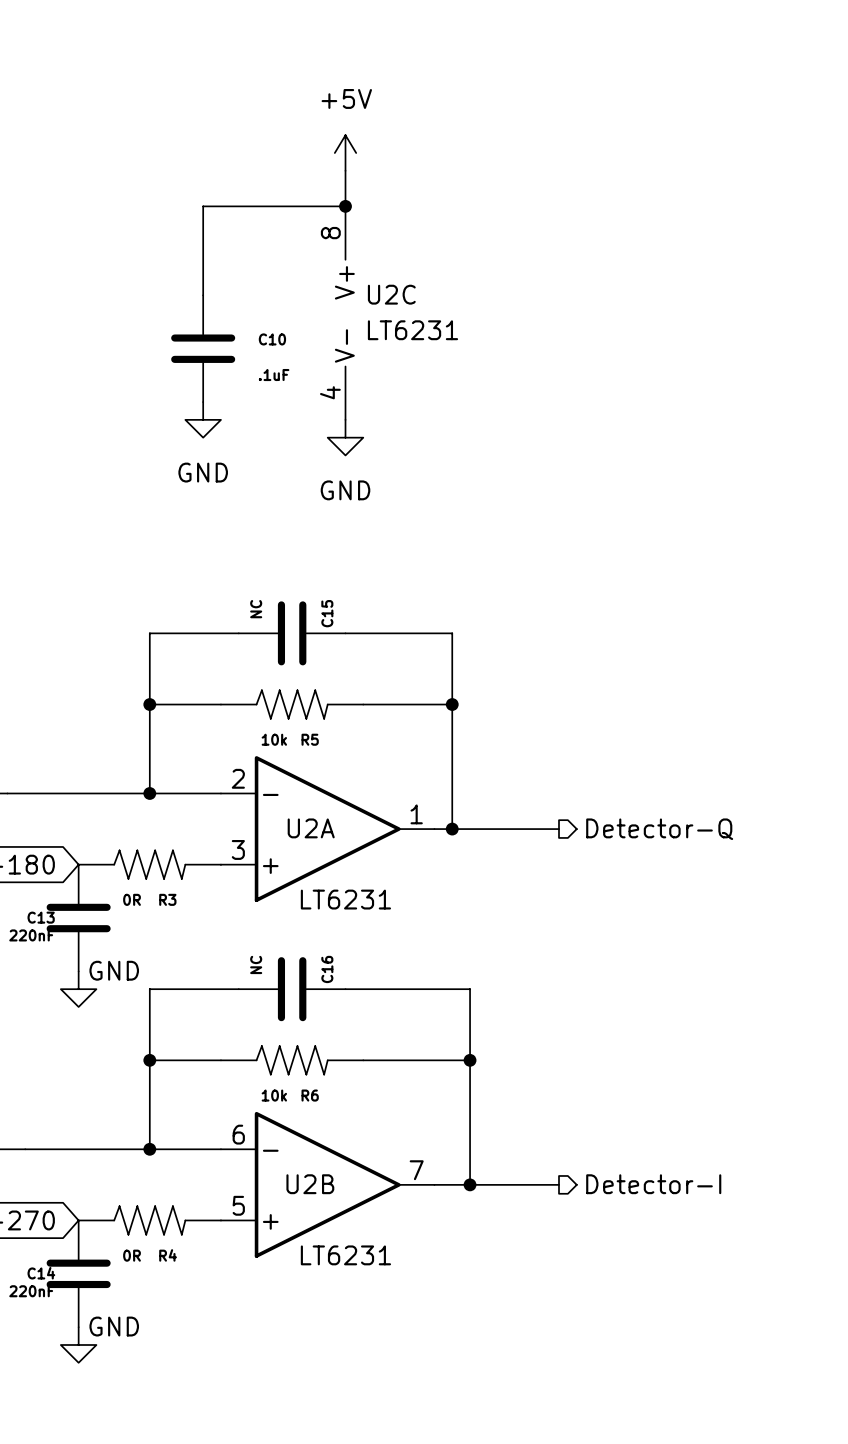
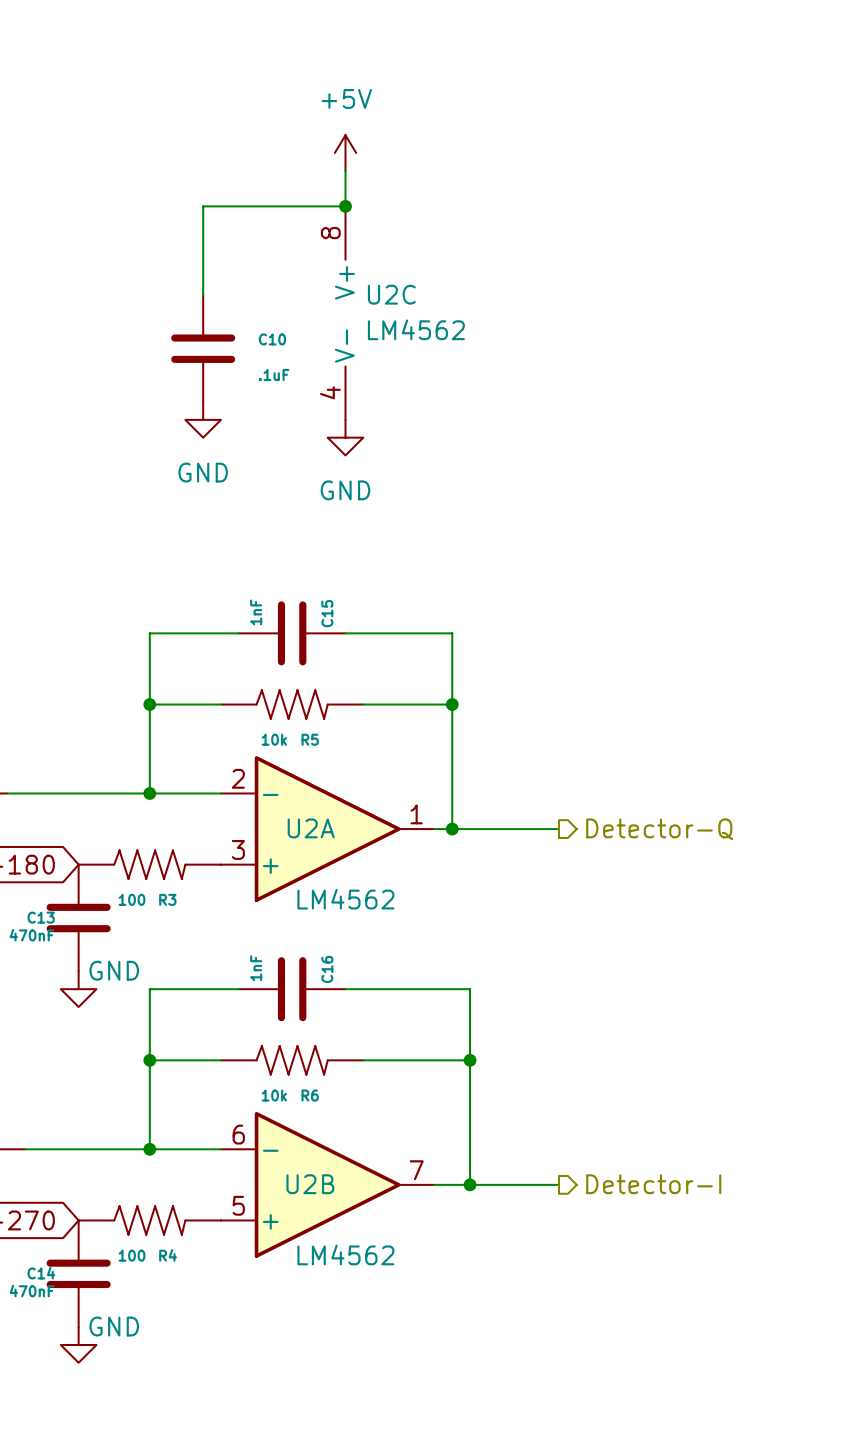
U2C value: LT6231 (412, 330) -> LM4562 (416, 329)
C15 value: NC (256, 609) -> 1nF (256, 612)
R3 value: 0R (132, 899) -> 100 (132, 899)
U2A value: LT6231 (345, 899) -> LM4562 (345, 899)
C13 value: 220nF (31, 935) -> 470nF (32, 935)
C16 value: NC (256, 964) -> 1nF (256, 968)
R4 value: 0R (132, 1255) -> 100 (132, 1255)
U2B value: LT6231 (345, 1255) -> LM4562 (345, 1254)
C14 value: 220nF (31, 1291) -> 470nF (32, 1291)

